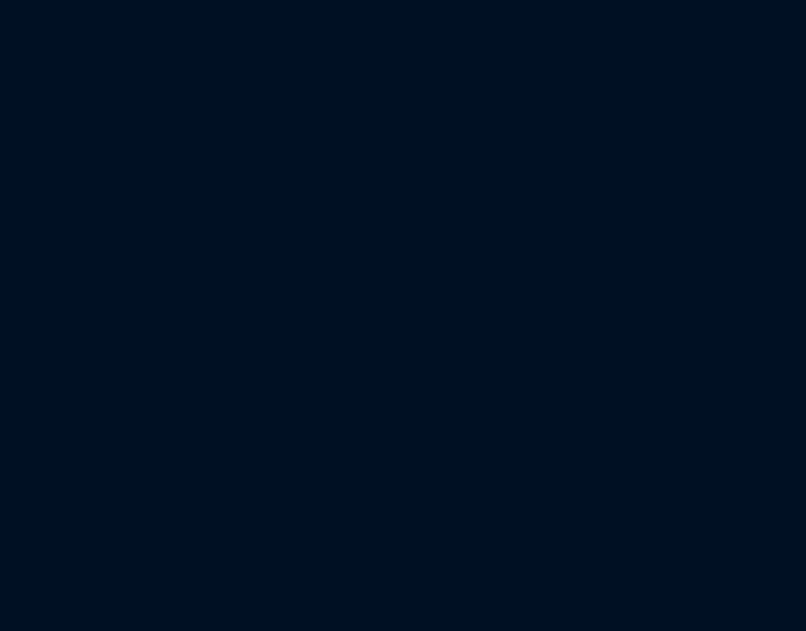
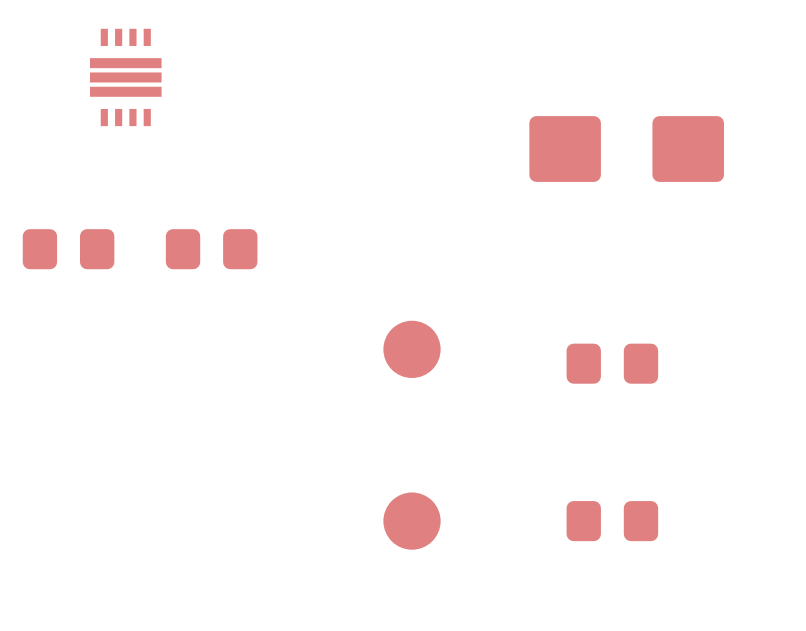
part: none -> (125, 77)
part: none -> (626, 149)
part: none -> (68, 249)
part: none -> (211, 249)
part: none -> (412, 349)
part: none -> (612, 363)
part: none -> (412, 521)
part: none -> (612, 521)

